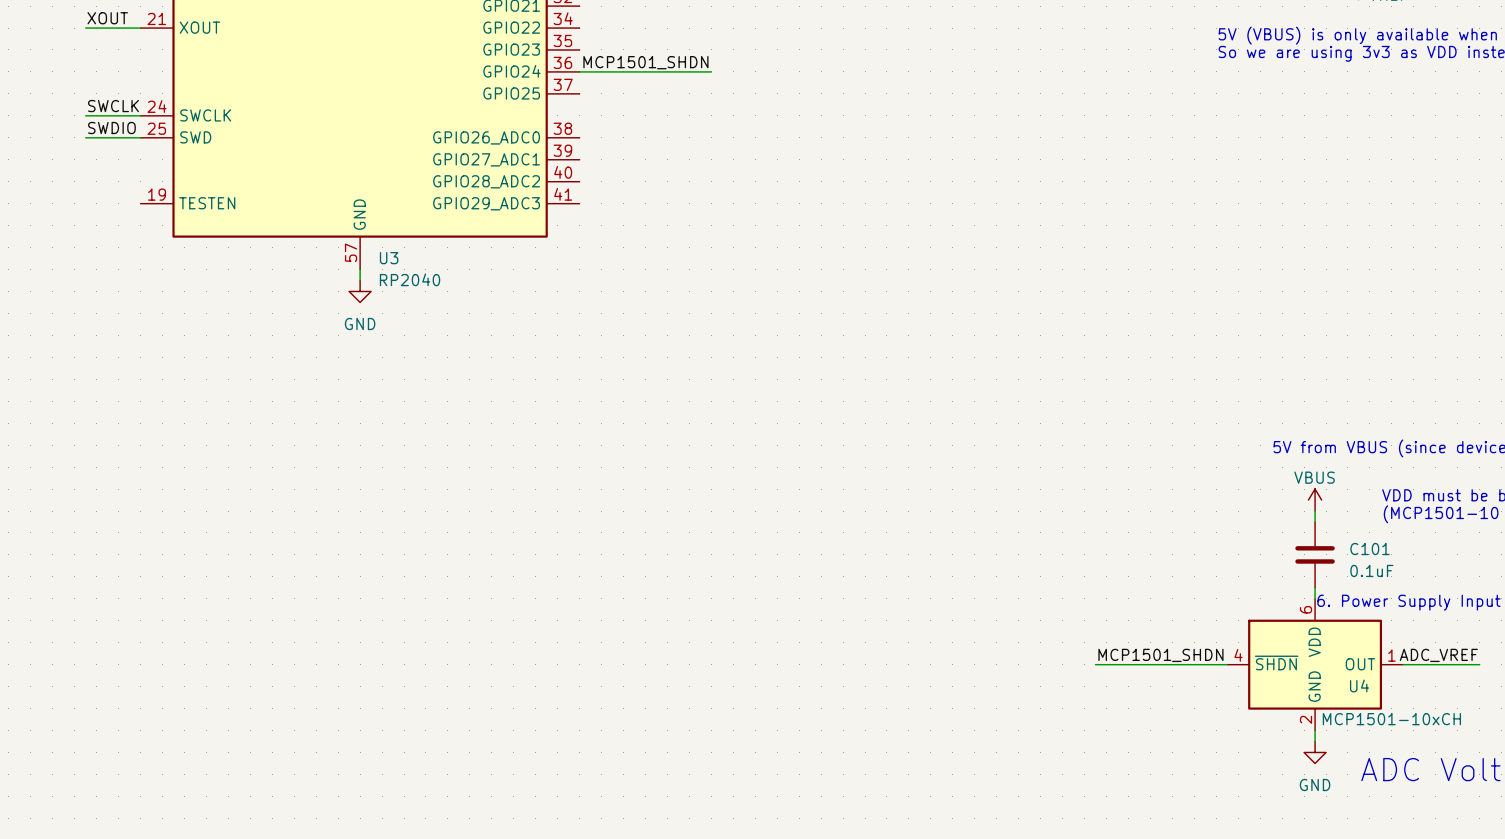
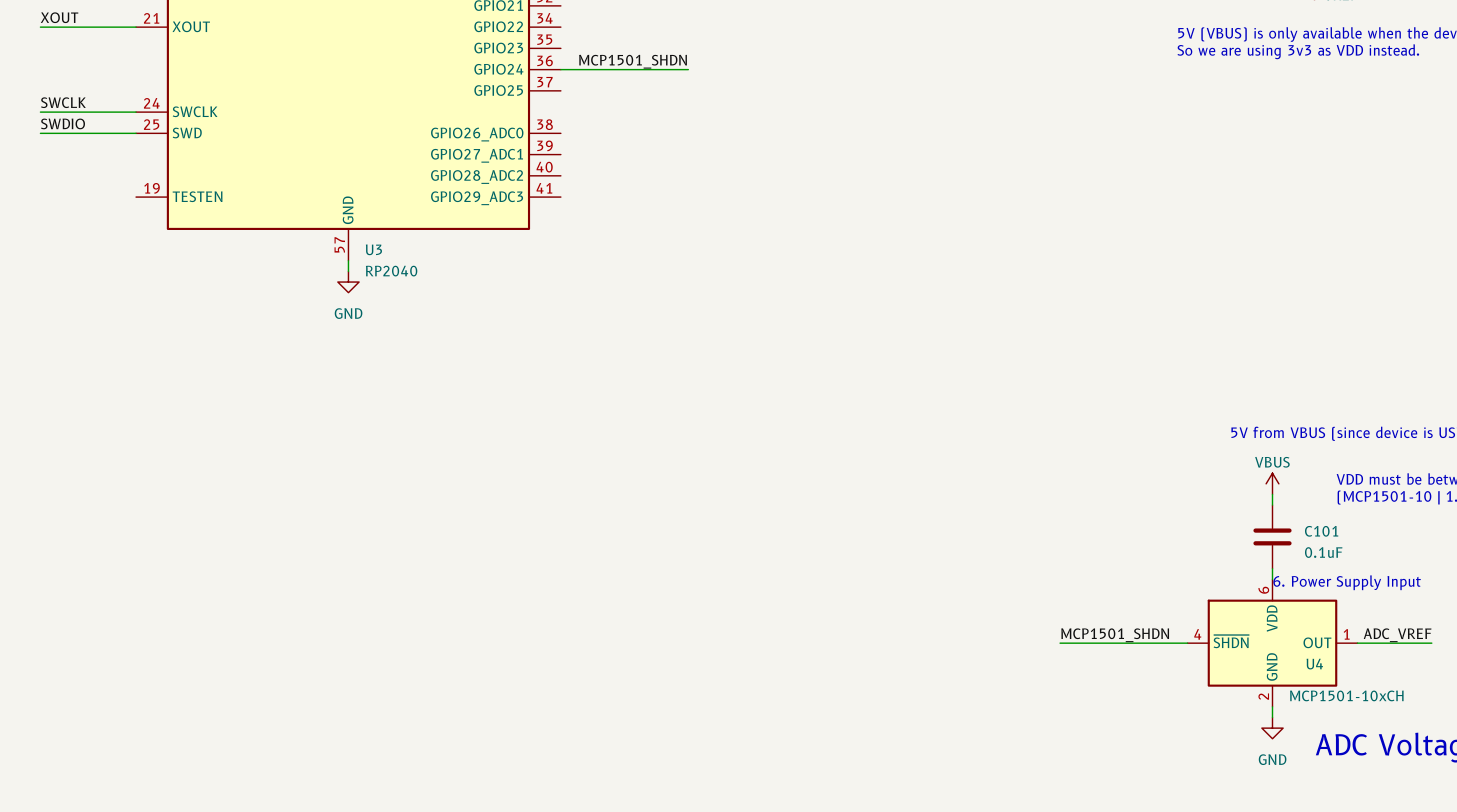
label position: XOUT (107, 18) -> XOUT (59, 17)
wire: none -> (40, 27) (82, 27)
label position: SWCLK (113, 106) -> SWCLK (63, 102)
wire: none -> (40, 112) (82, 112)
label position: SWDIO (111, 128) -> SWDIO (63, 123)
wire: none -> (40, 133) (82, 133)

